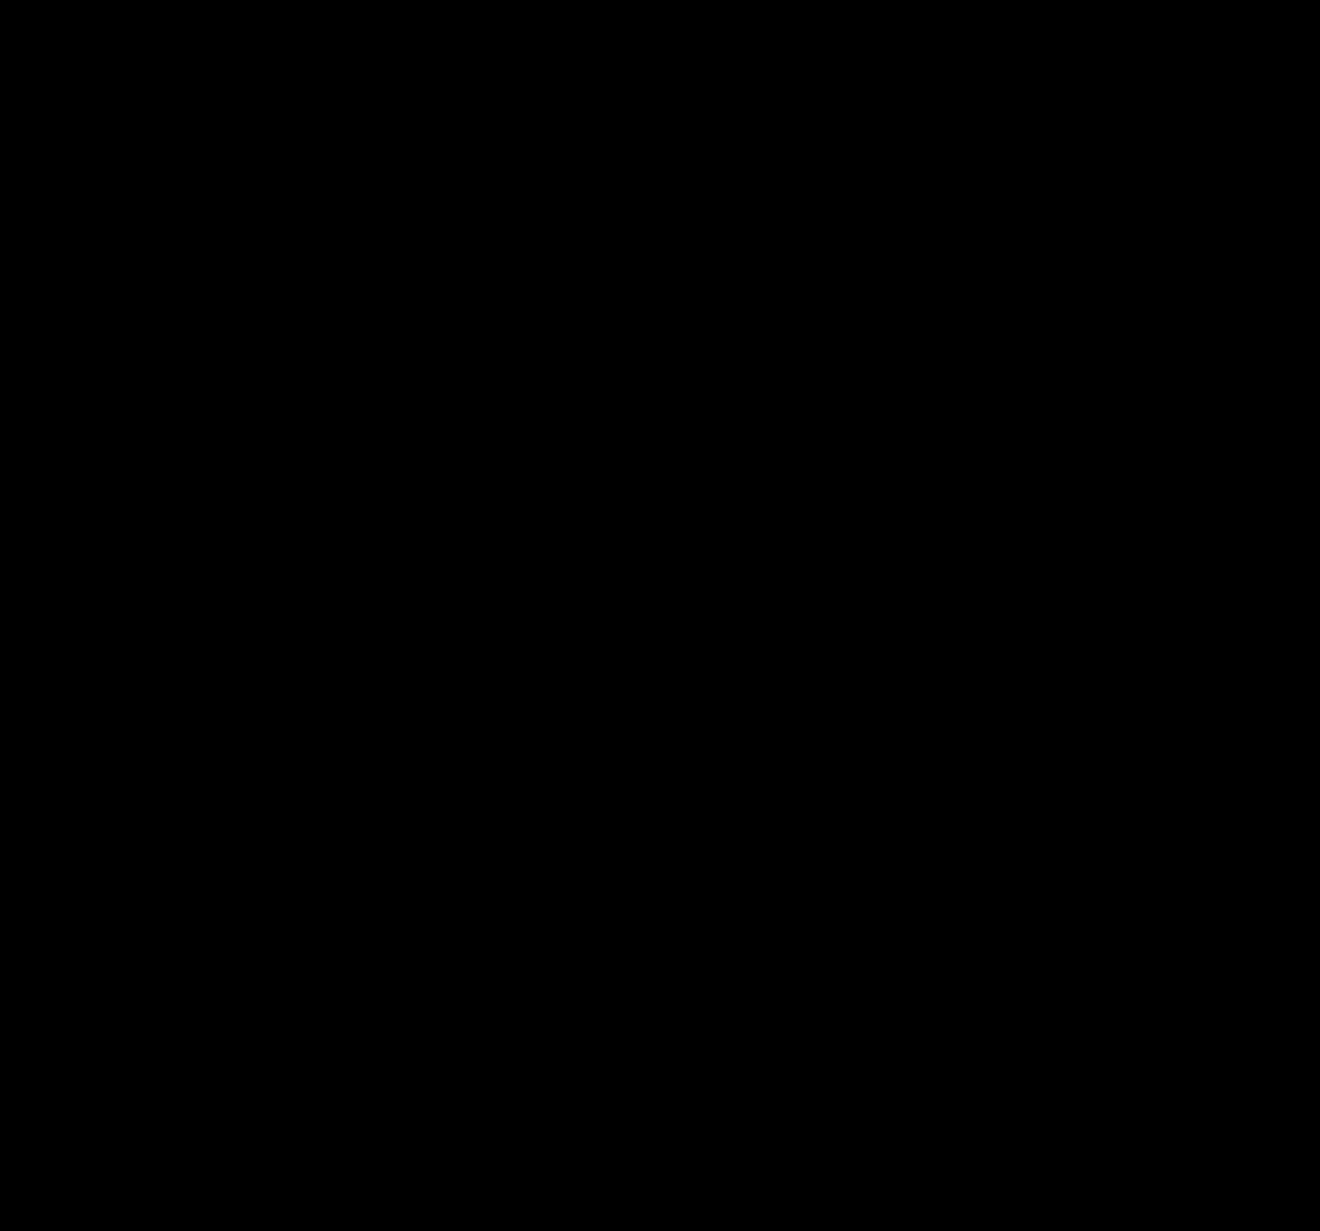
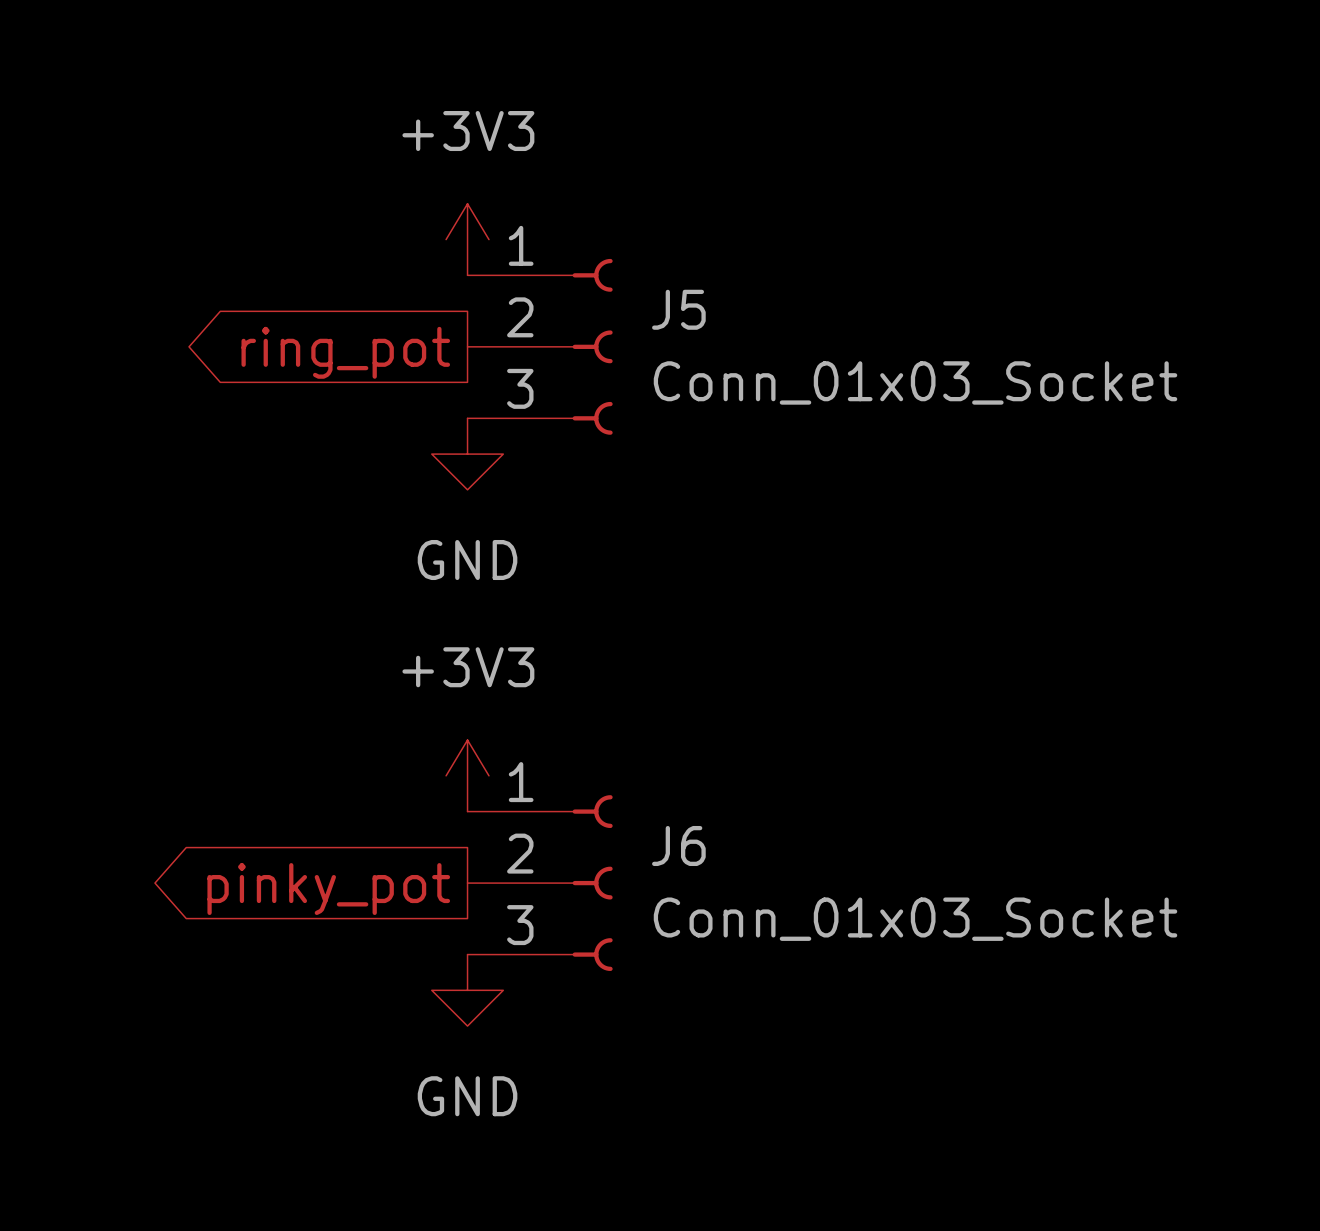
power symbol: none -> +3V3 (467, 239)
J5: none -> Conn_01x03_Socket (540, 346)
global label: none -> ring_pot (345, 352)
power symbol: none -> GND (467, 454)
power symbol: none -> +3V3 (467, 775)
J6: none -> Conn_01x03_Socket (540, 883)
global label: none -> pinky_pot (328, 889)
power symbol: none -> GND (467, 990)

